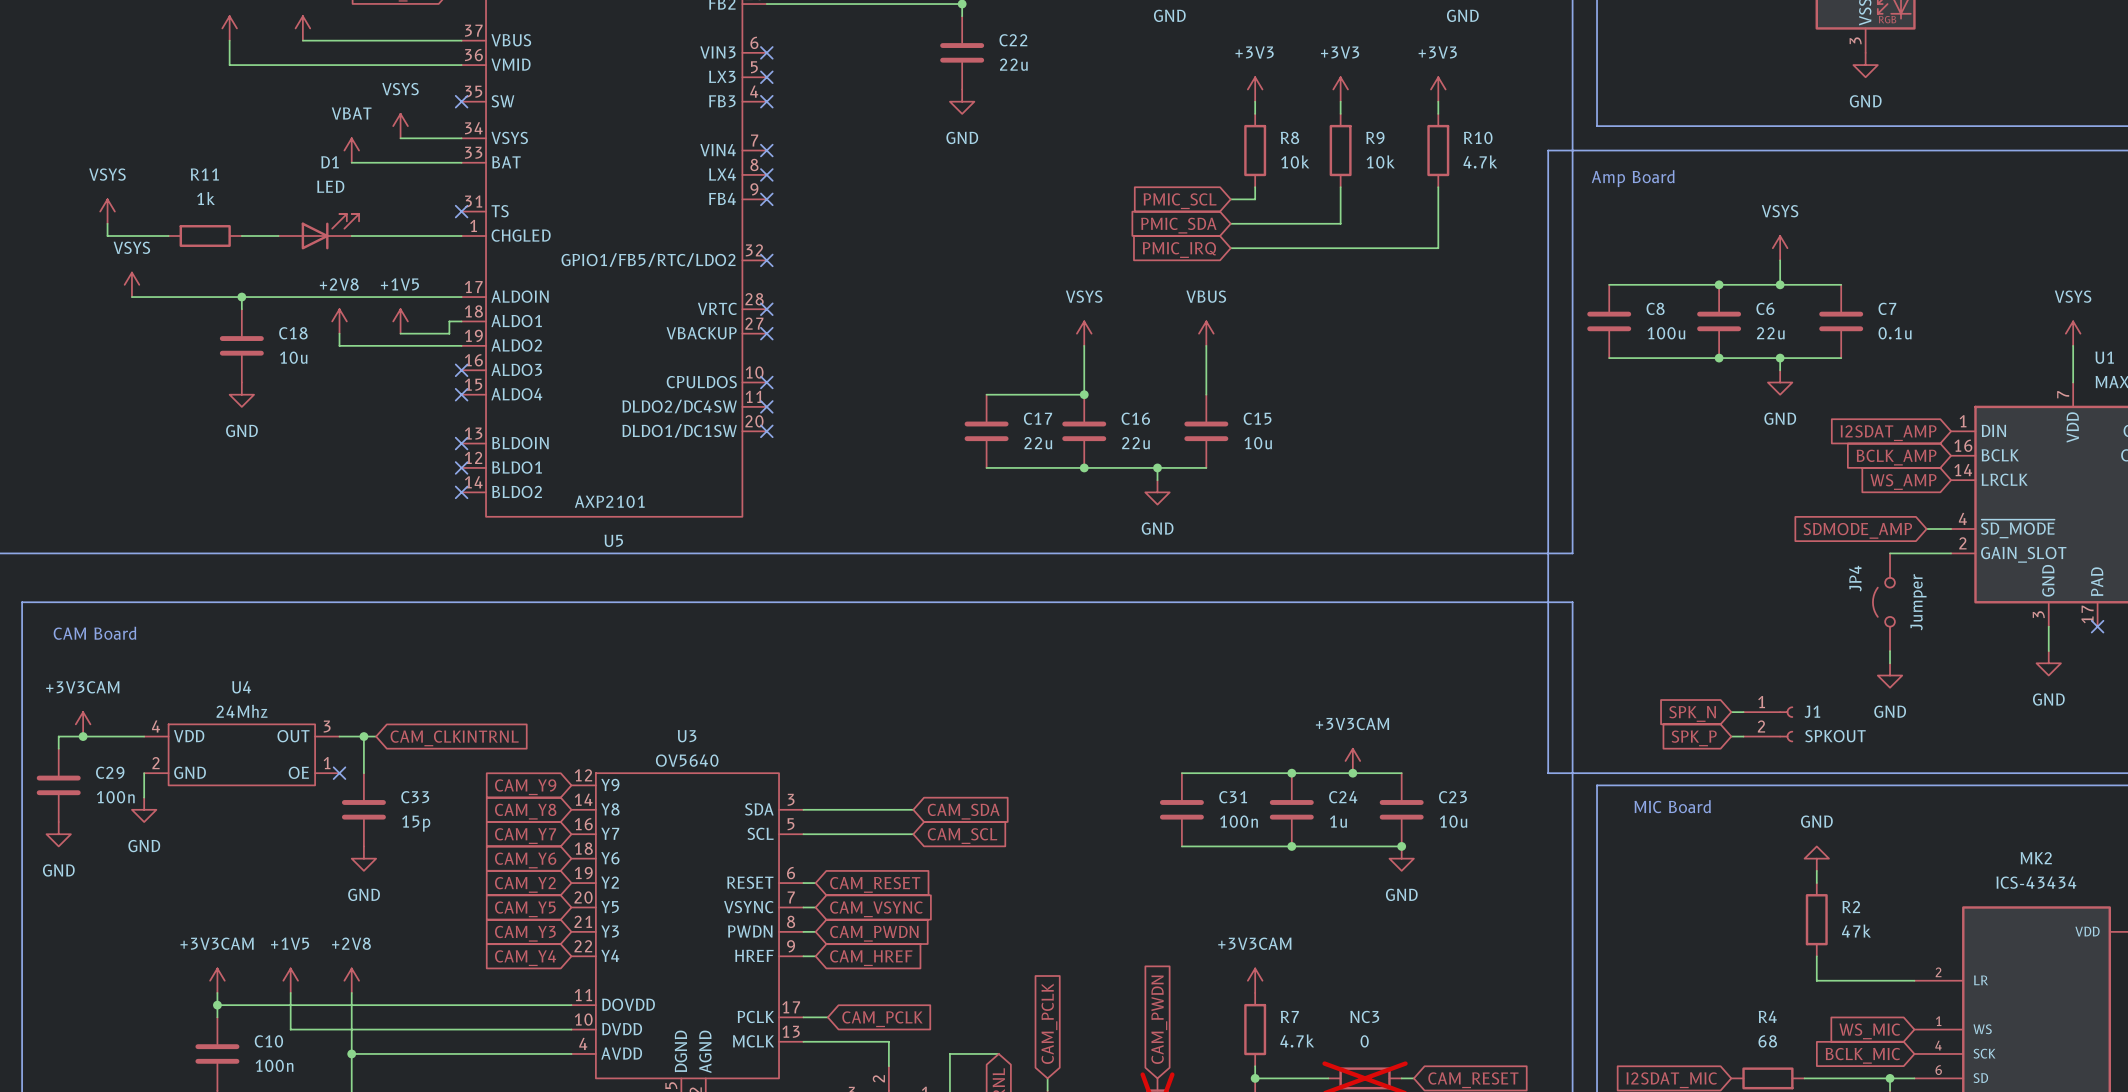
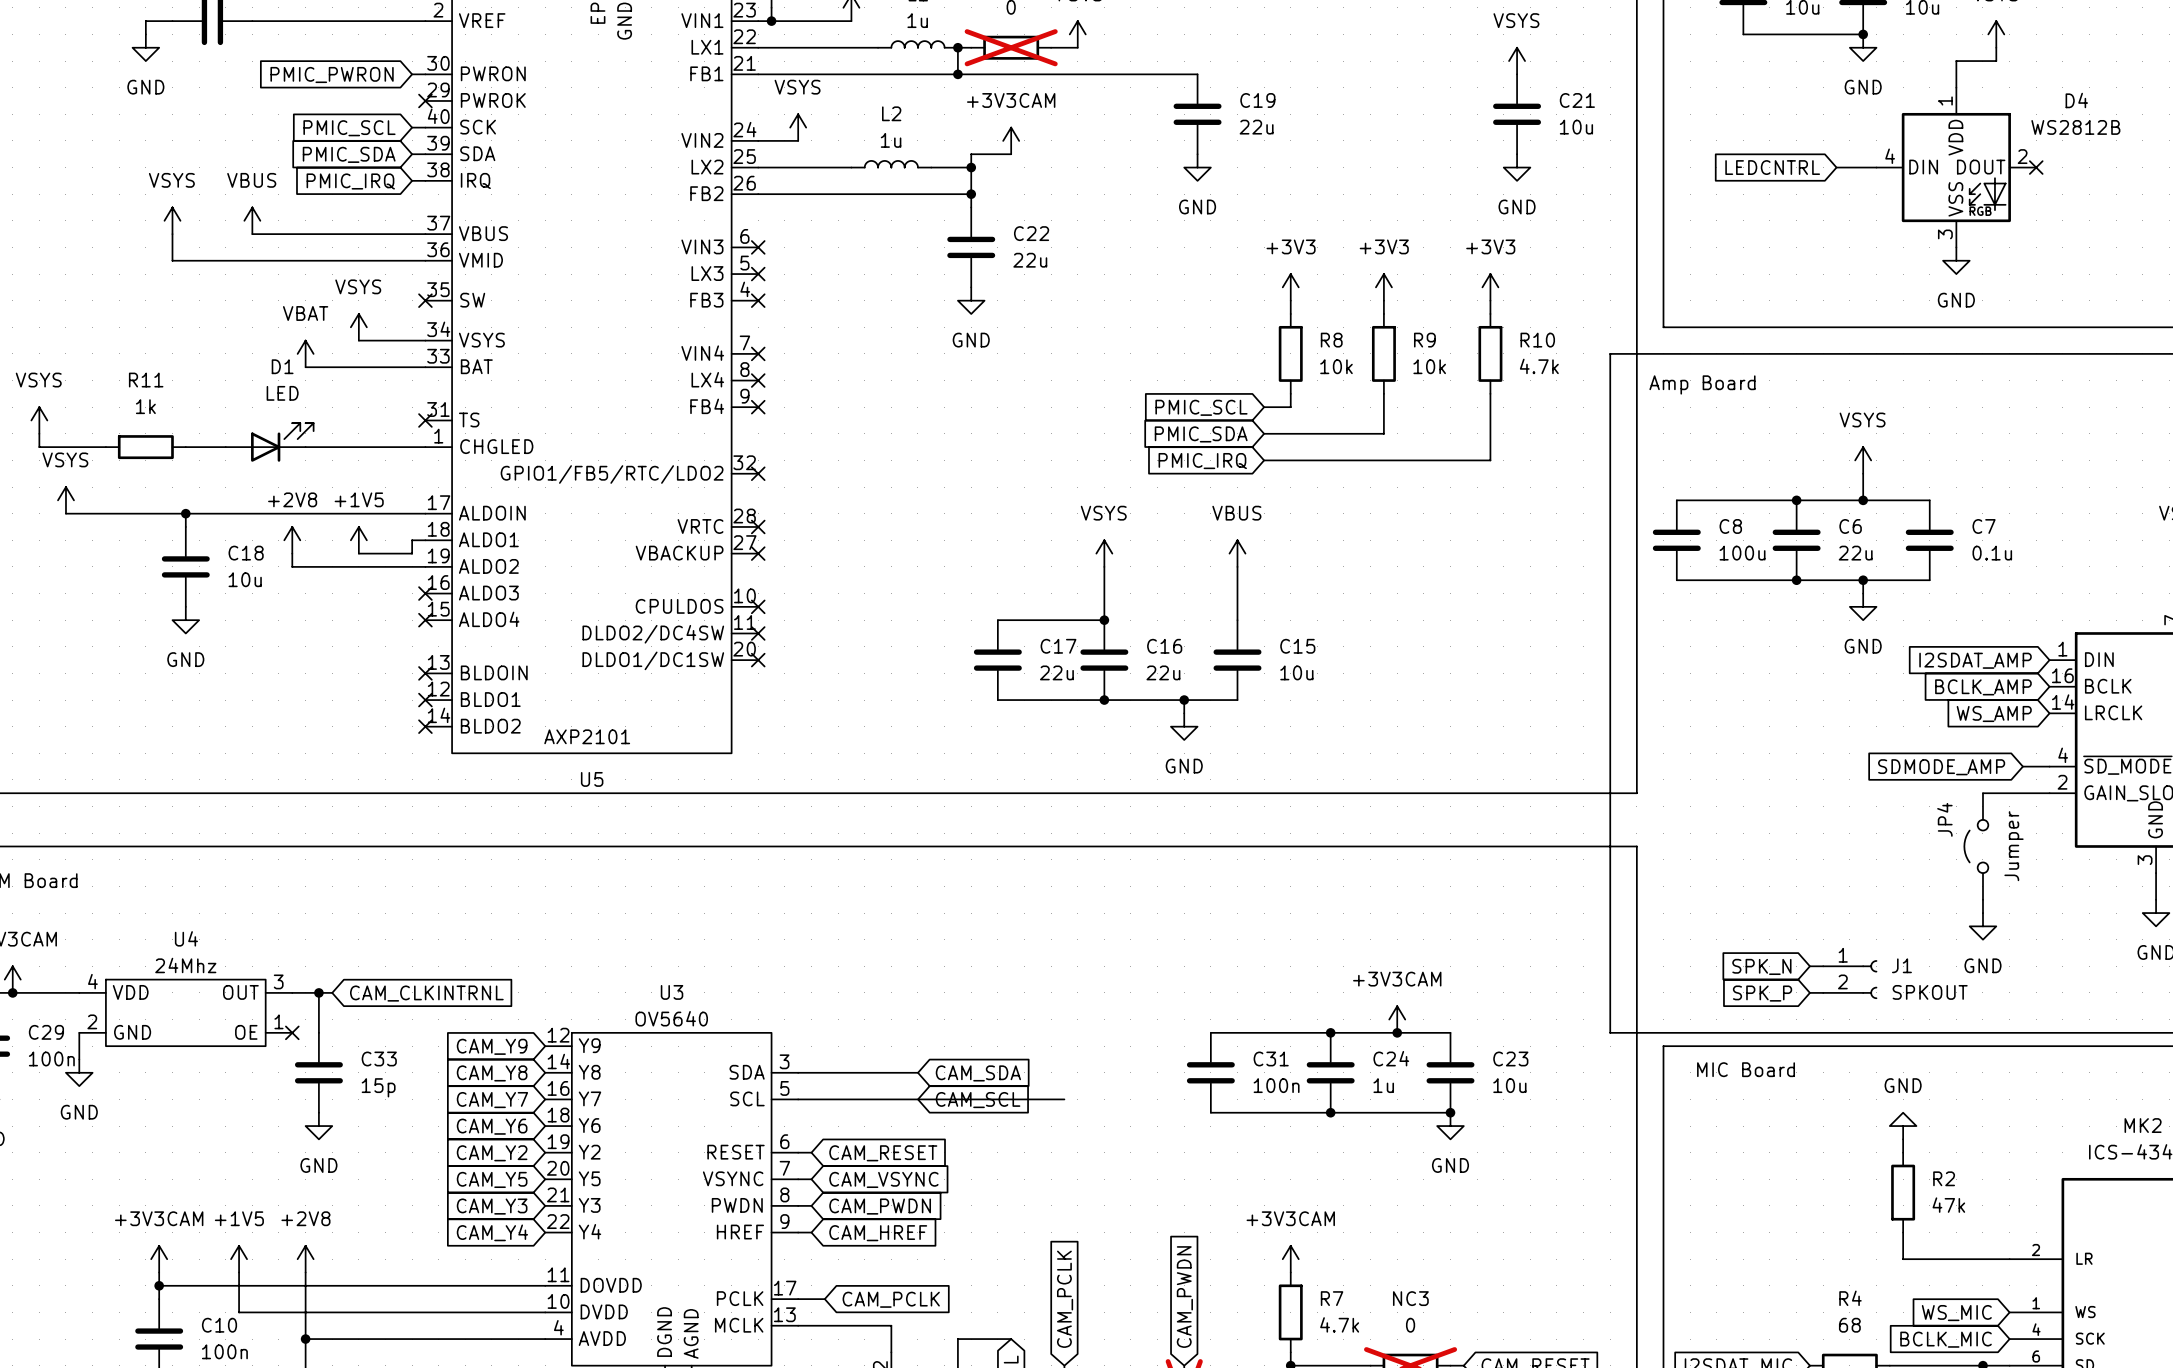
wire: none -> (917, 1099) (1064, 1099)

